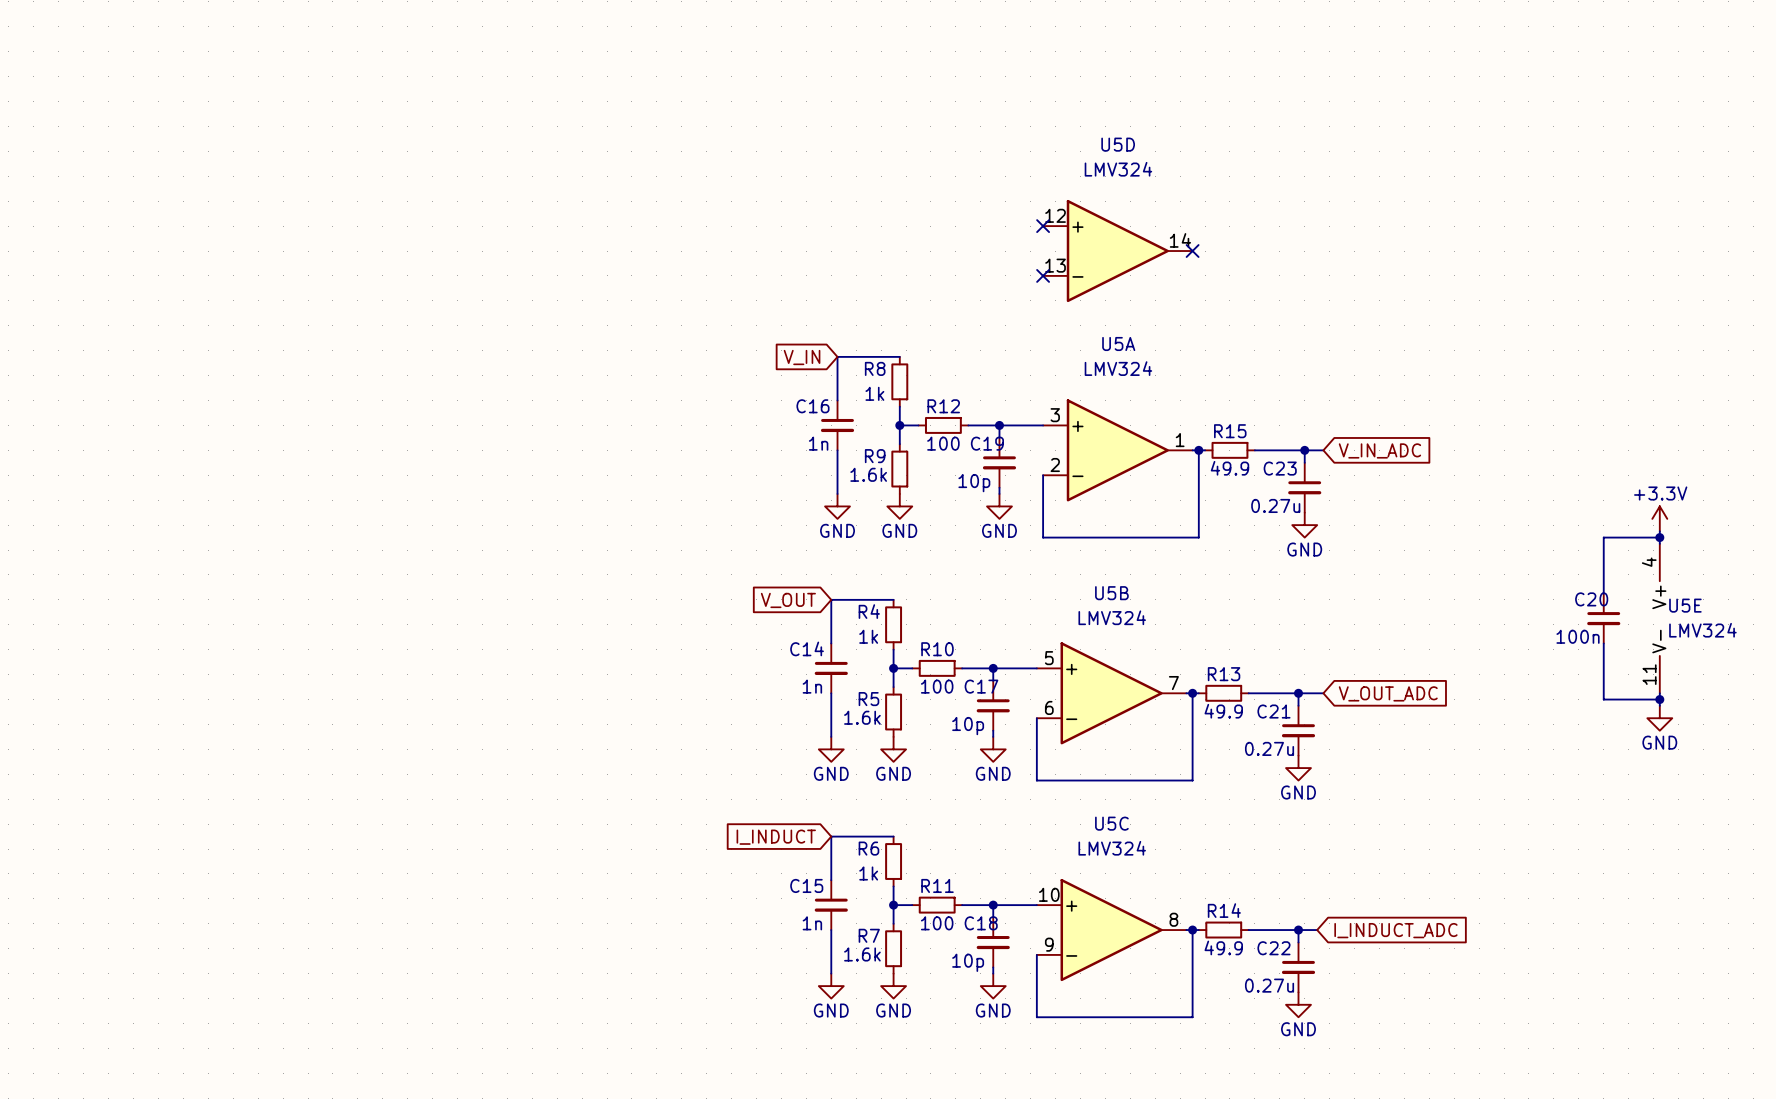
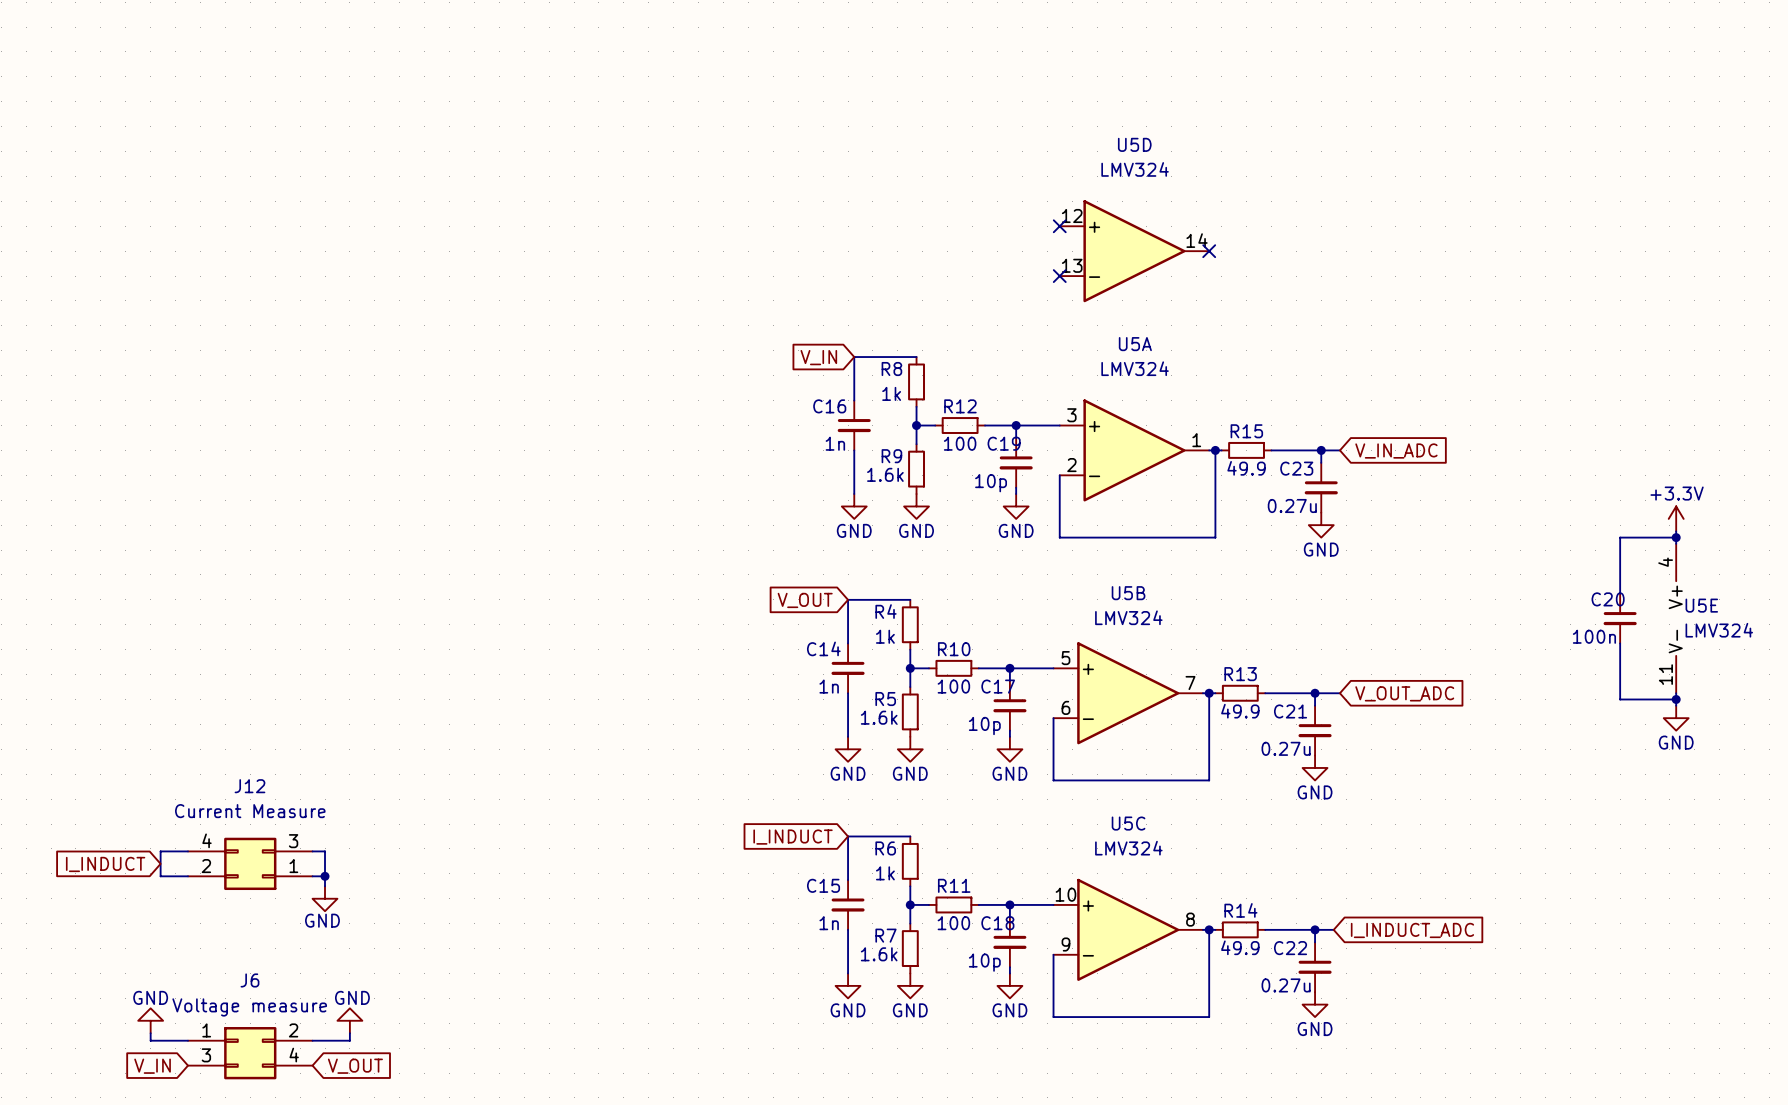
wire: none -> (188, 851) (160, 851) (160, 876) (188, 876)
wire: none -> (312, 851) (325, 851) (325, 886)
global label: none -> I_INDUCT (105, 864)
J12: none -> Current Measure (250, 863)
wire: none -> (312, 876) (325, 876)
junction: none -> (325, 876)
power symbol: none -> GND (325, 898)
power symbol: none -> GND (150, 1020)
power symbol: none -> GND (349, 1020)
wire: none -> (150, 1033) (150, 1040) (188, 1040)
wire: none -> (349, 1033) (349, 1040) (312, 1040)
J6: none -> Voltage measure (250, 1053)
global label: none -> V_IN (152, 1066)
global label: none -> V_OUT (355, 1066)

